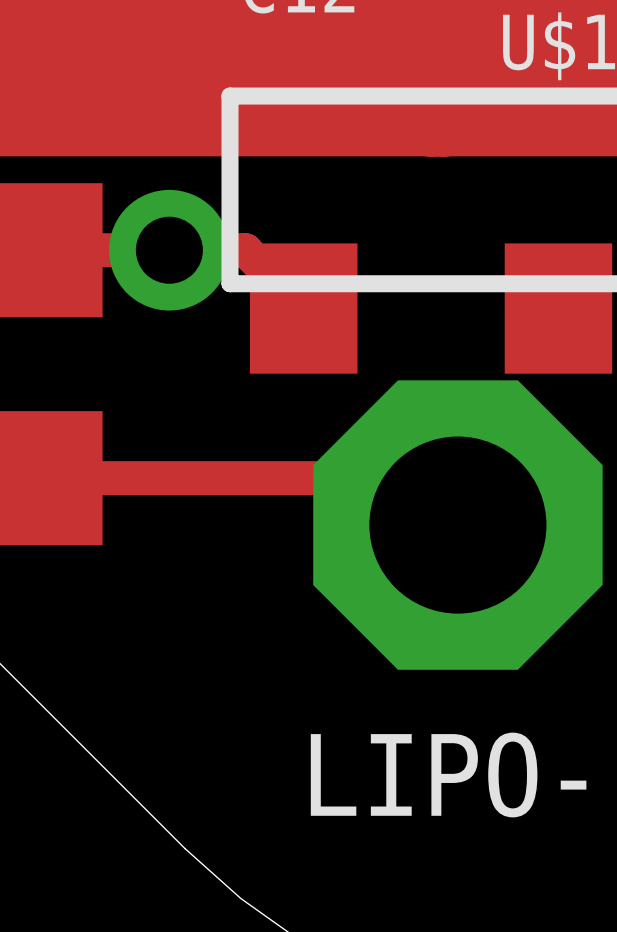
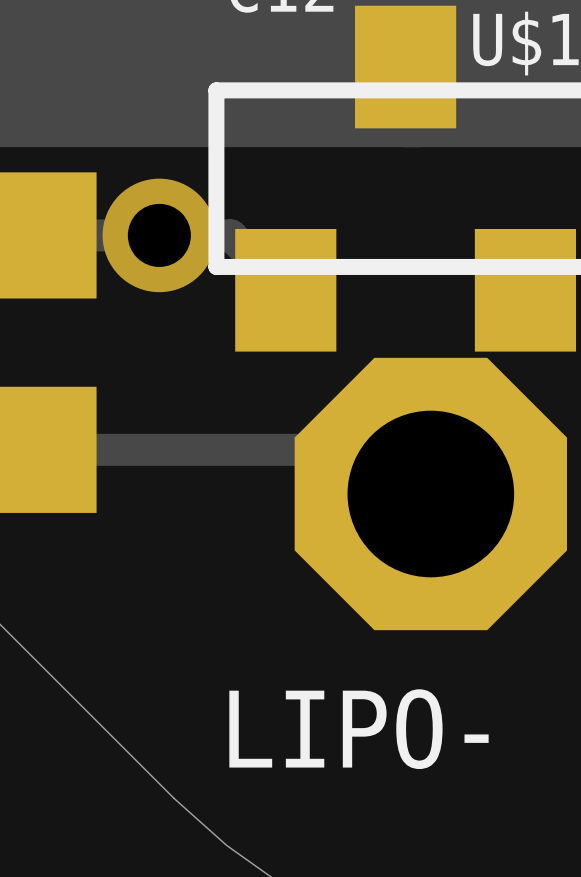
LIPO- name position: LIPO- (448, 775) -> LIPO- (358, 729)

